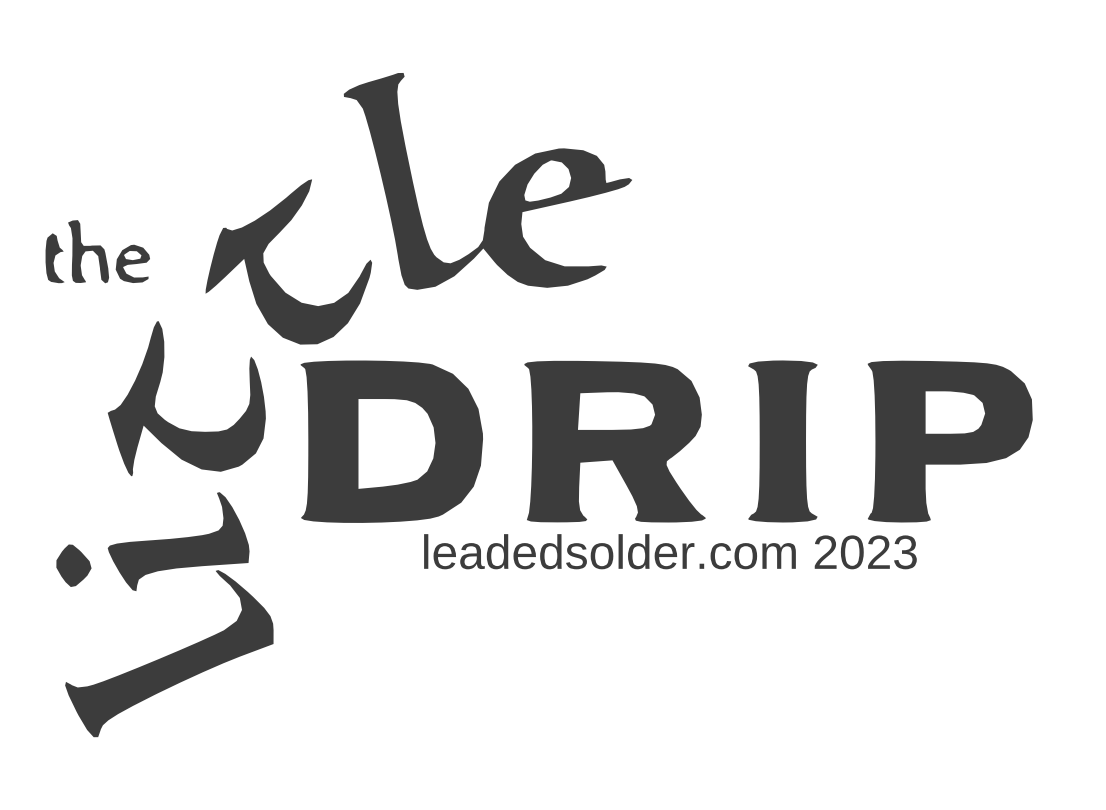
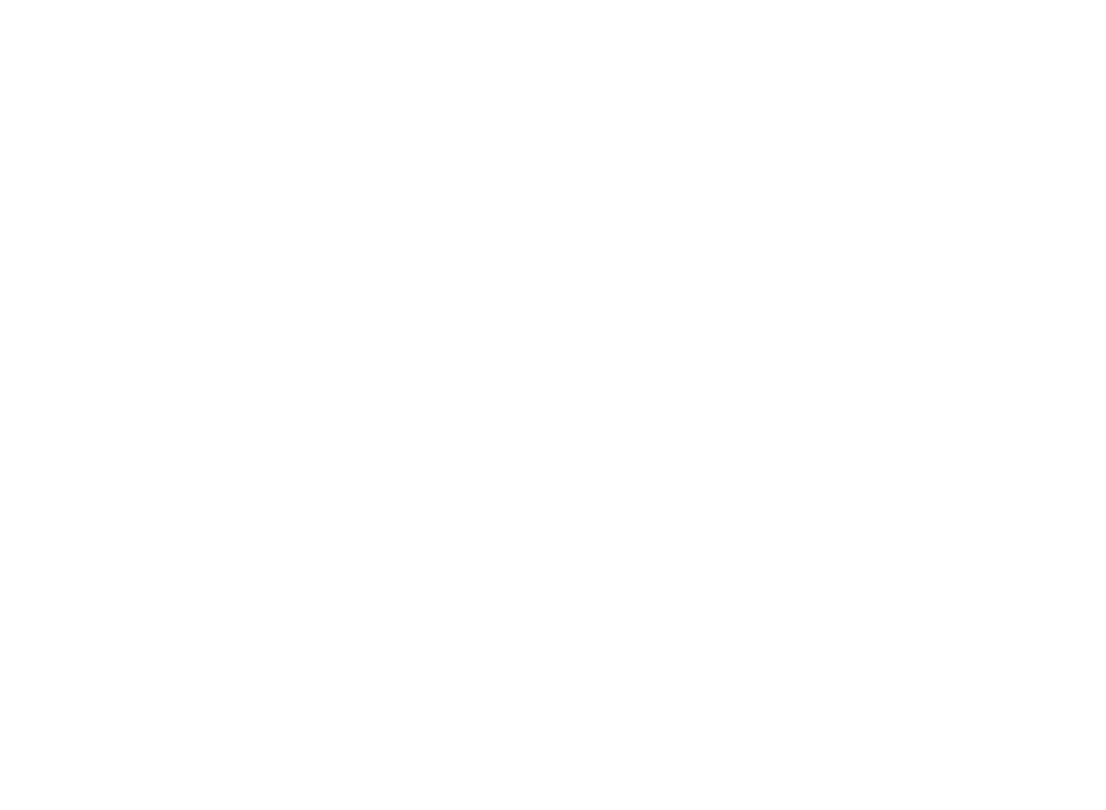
drawing: [45, 72, 1033, 738] -> none
text: leadedsolder.com 2023 (670, 551) -> none

